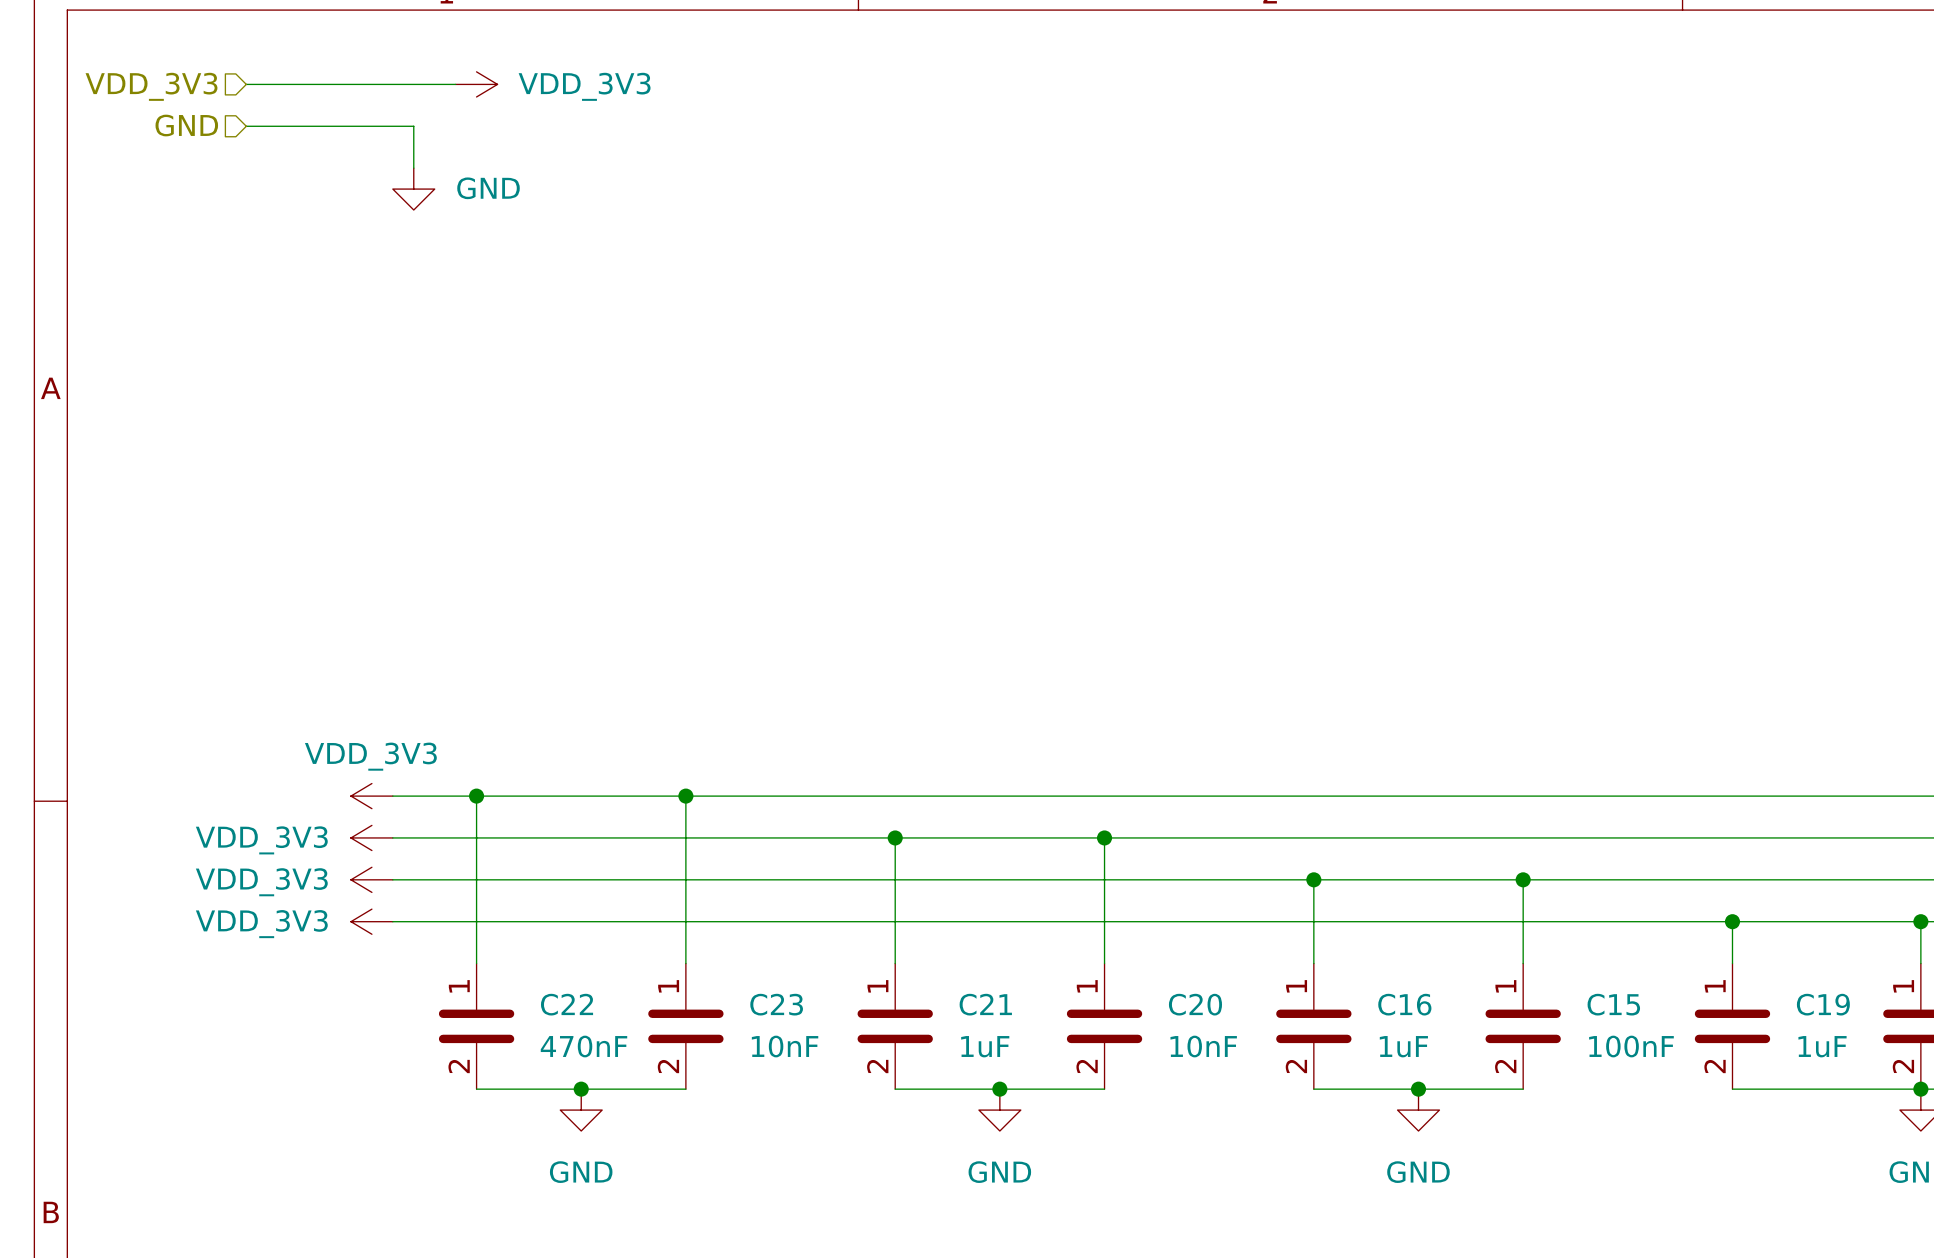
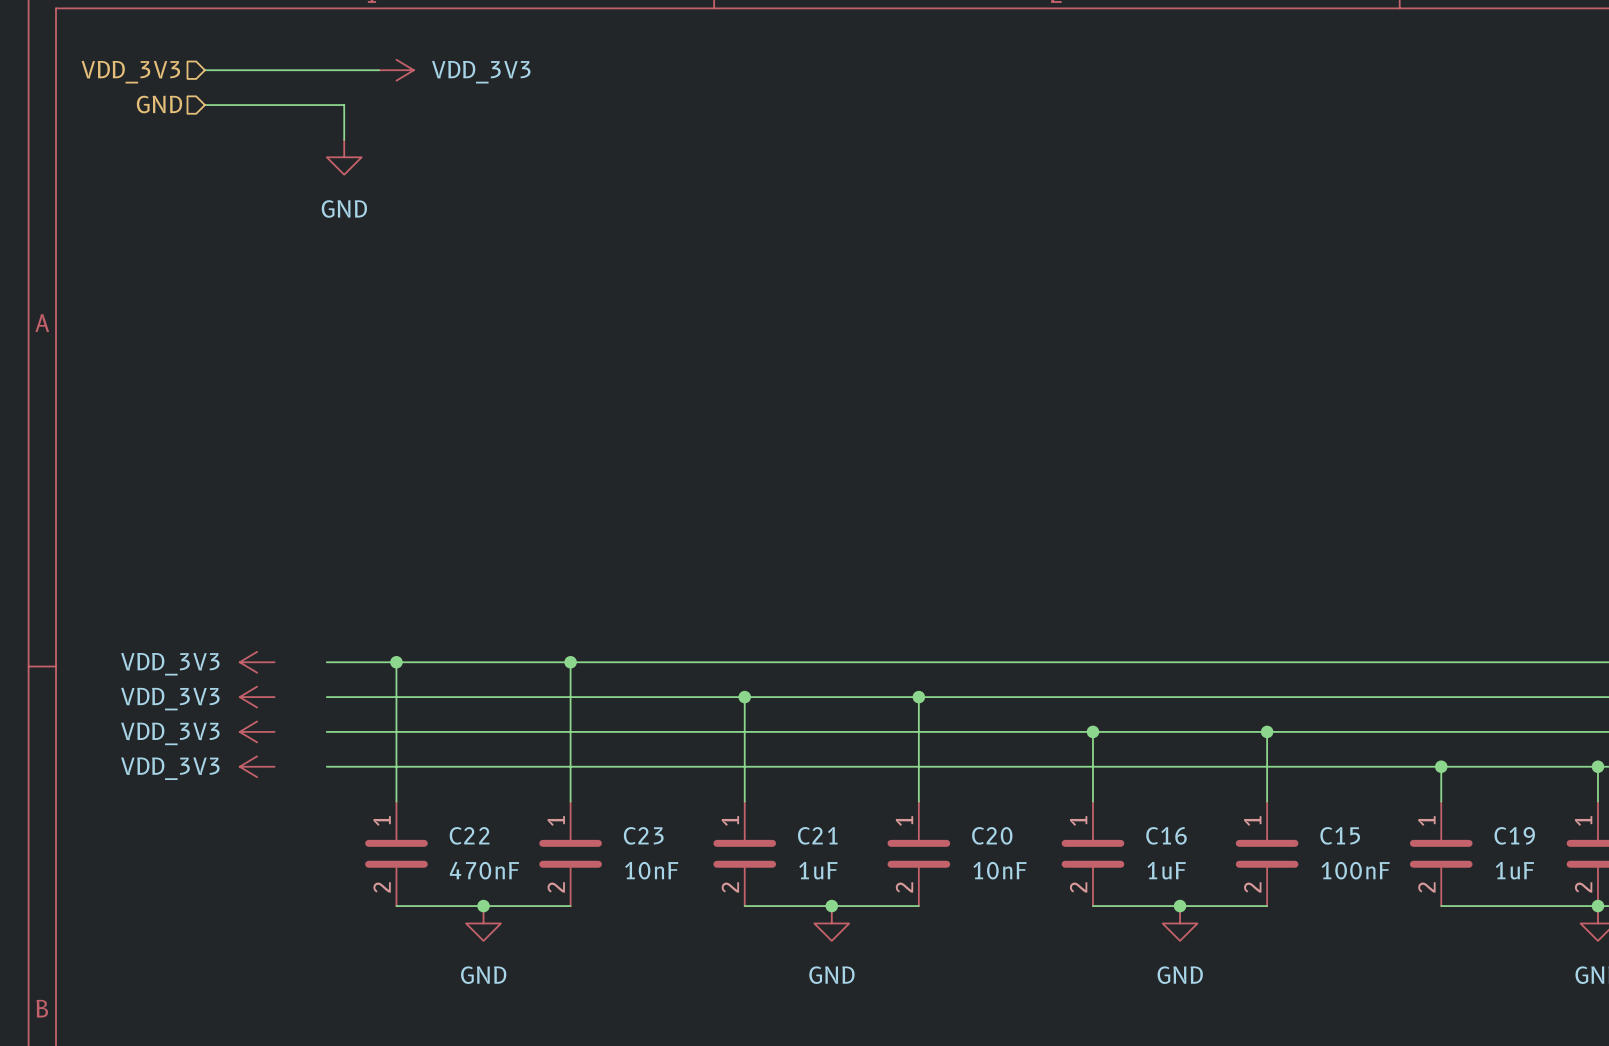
power symbol text position: GND (488, 188) -> GND (344, 208)
power symbol: none -> VDD_3V3 (257, 662)
power symbol: VDD_3V3 (371, 796) -> none
power symbol: none -> VDD_3V3 (257, 697)
power symbol: VDD_3V3 (371, 837) -> none
power symbol: none -> VDD_3V3 (257, 731)
power symbol: VDD_3V3 (371, 879) -> none
power symbol: none -> VDD_3V3 (257, 766)
power symbol: VDD_3V3 (371, 921) -> none

